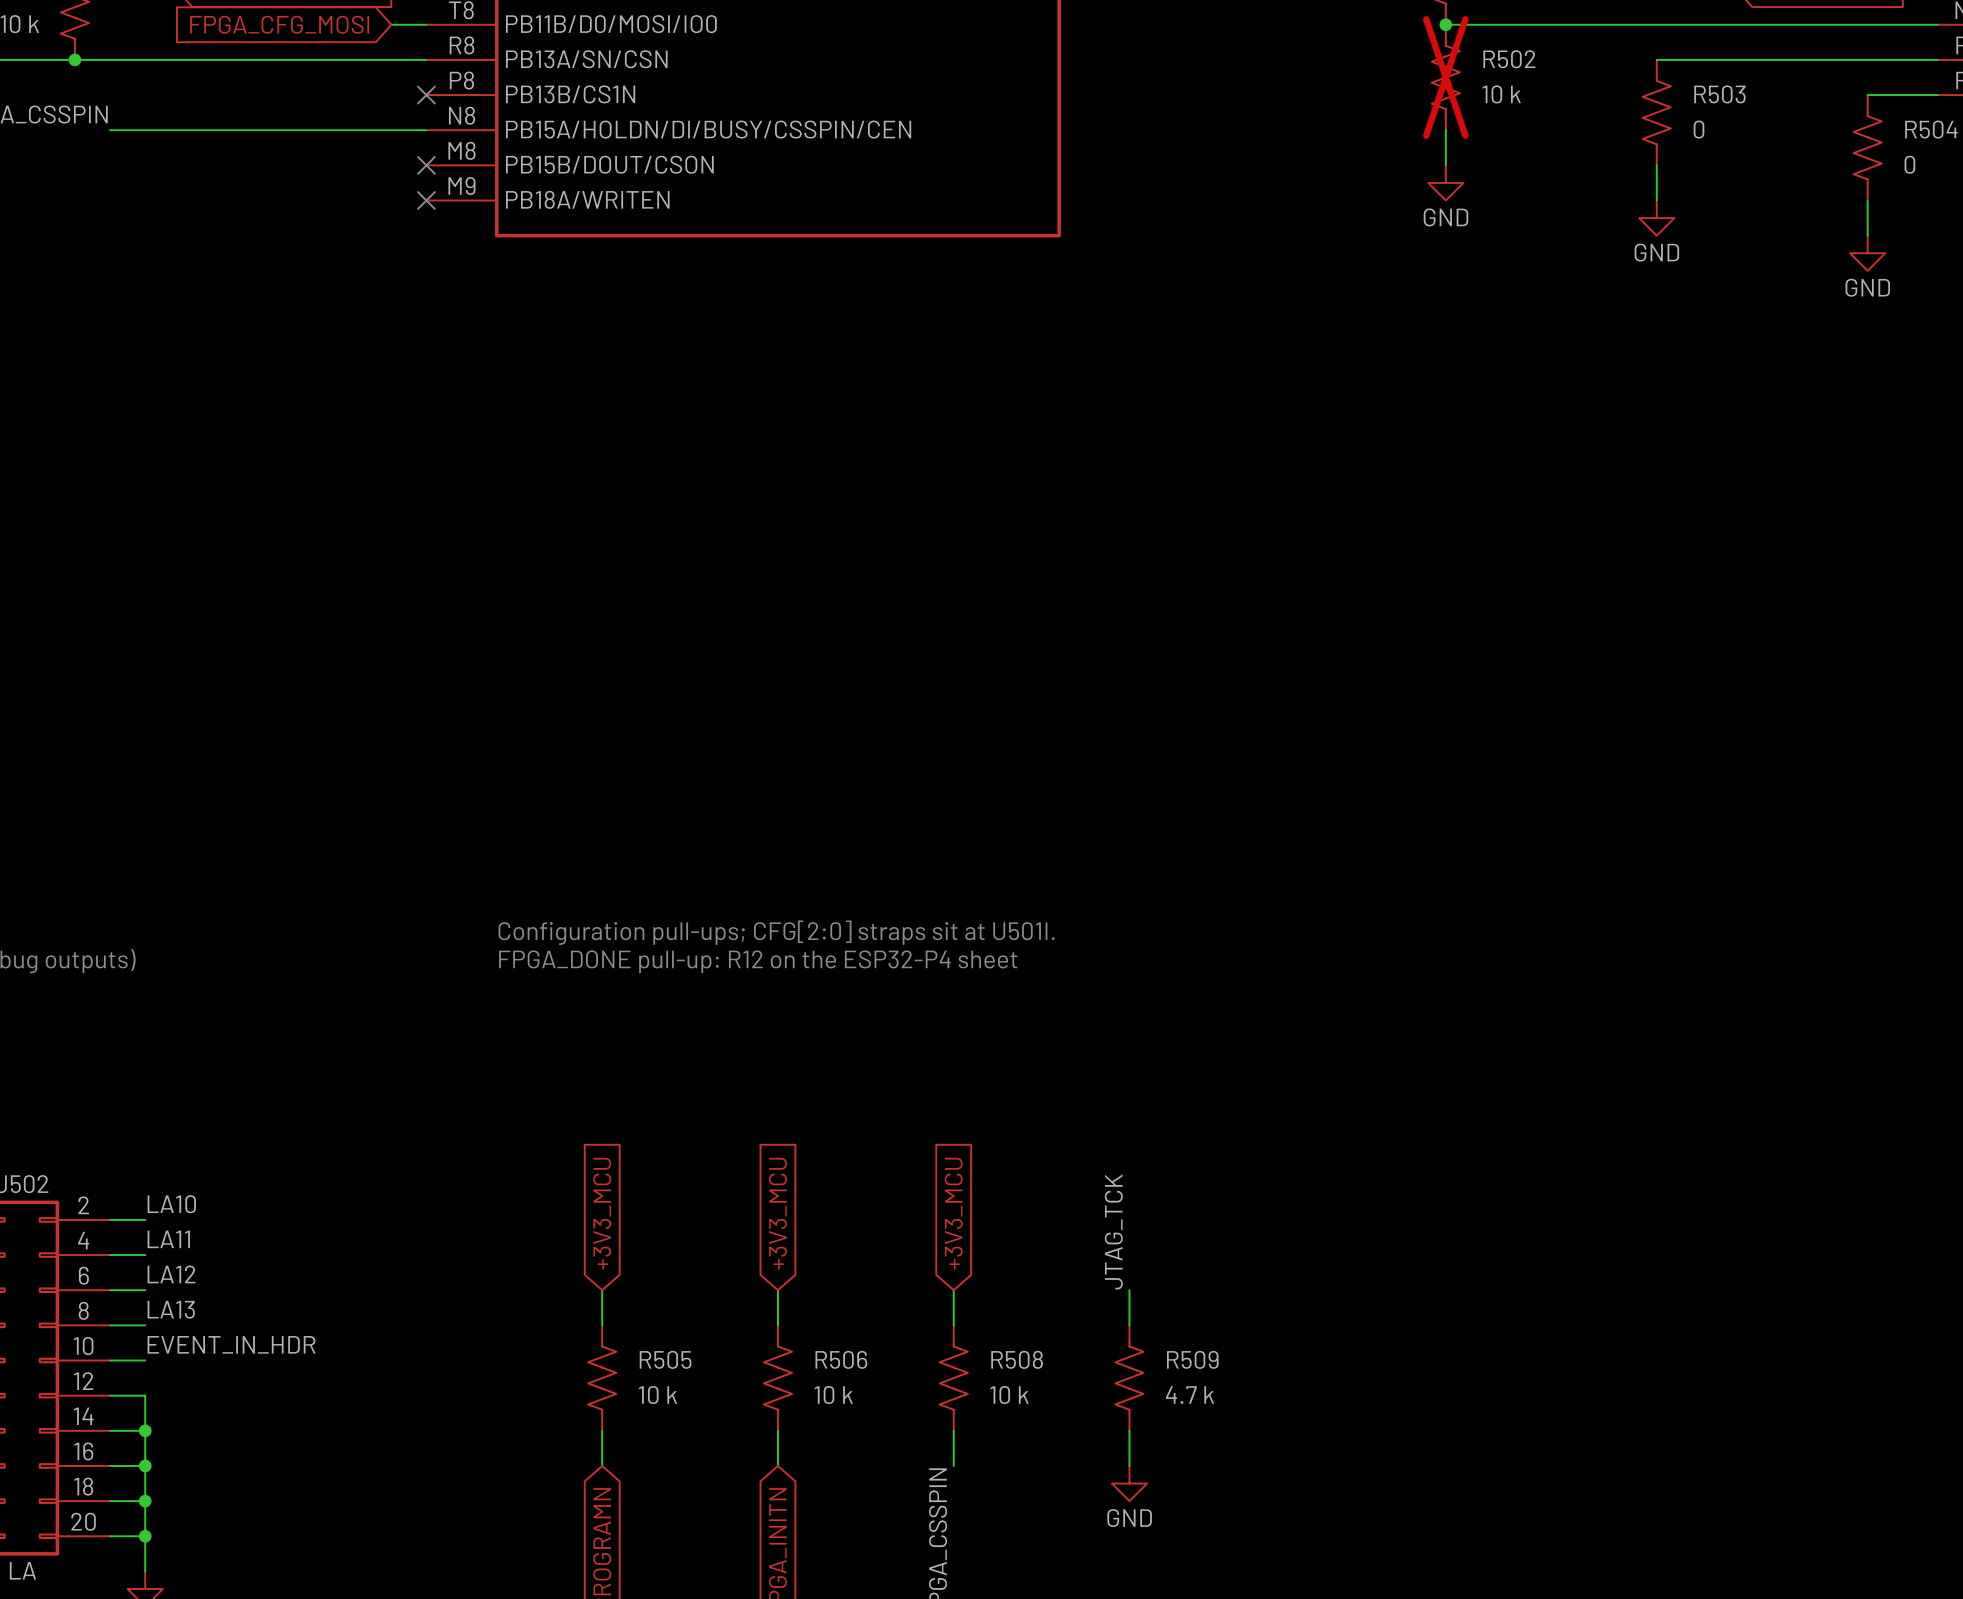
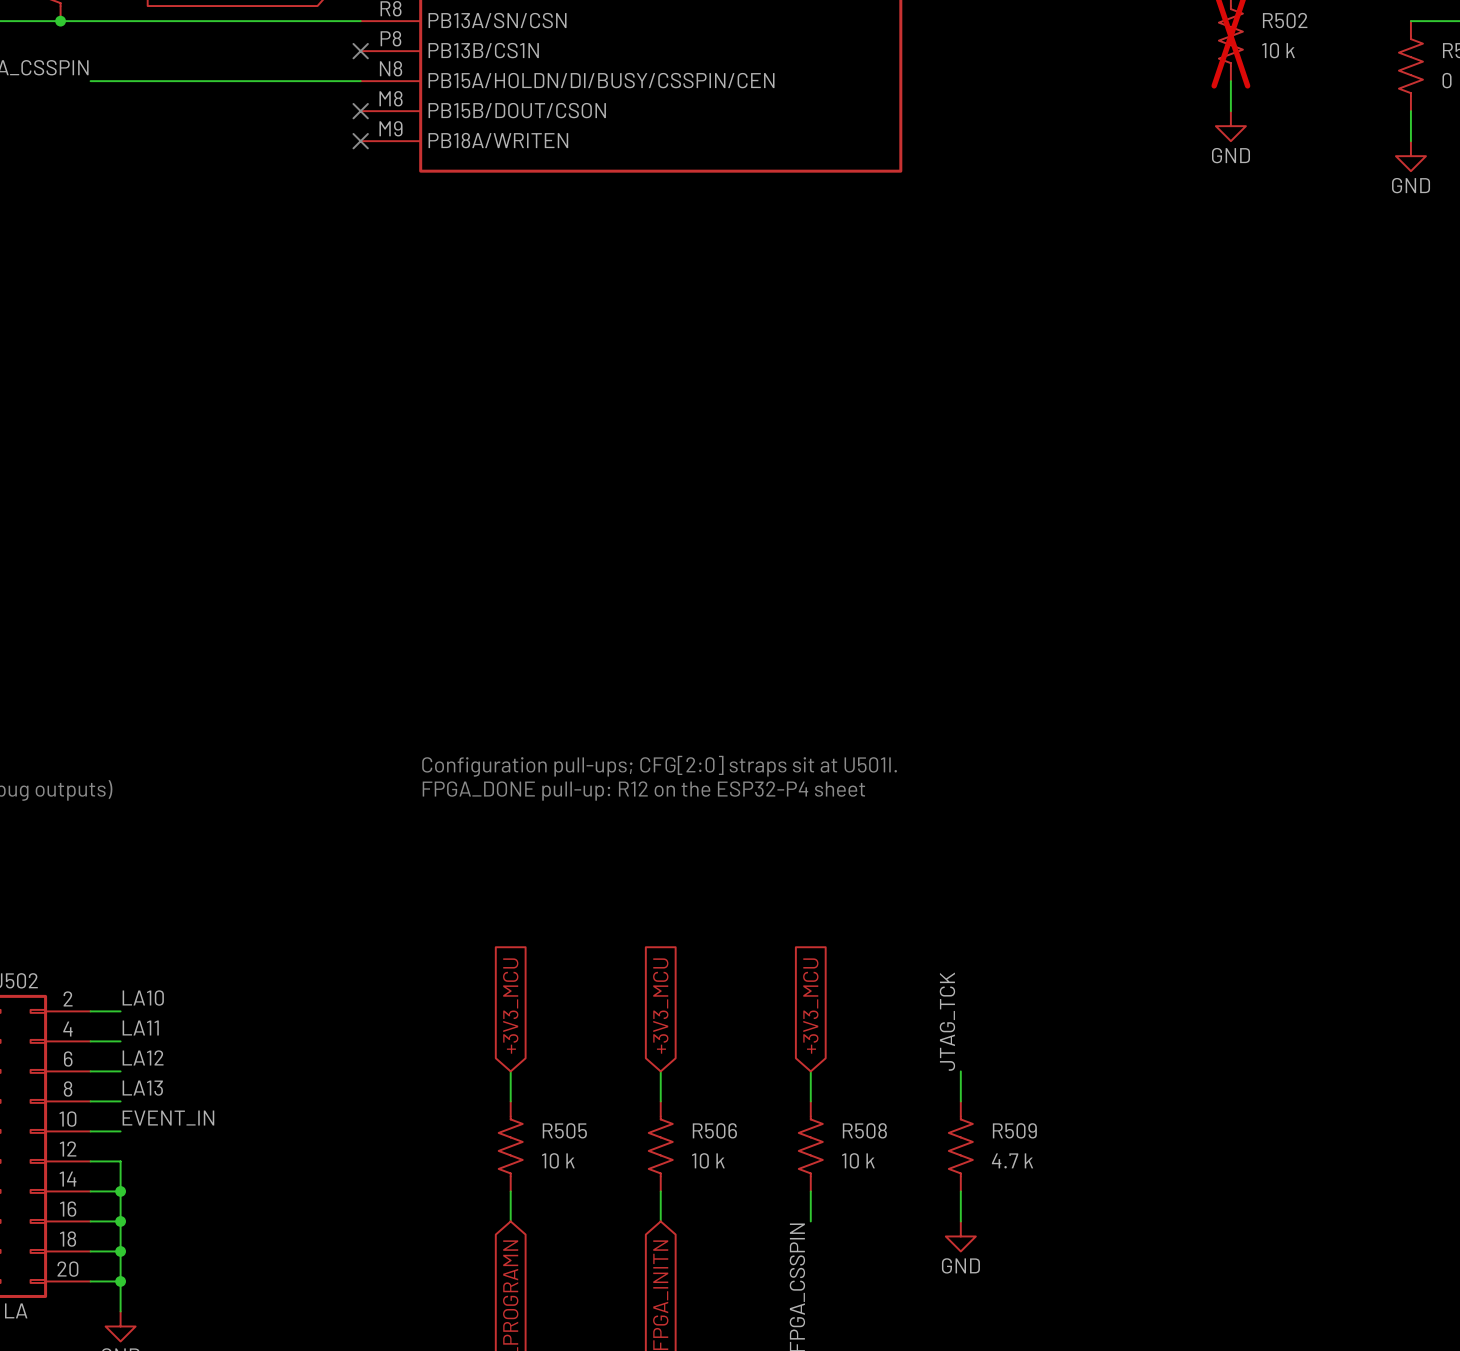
label: EVENT_IN_HDR (231, 1344) -> EVENT_IN (168, 1118)

